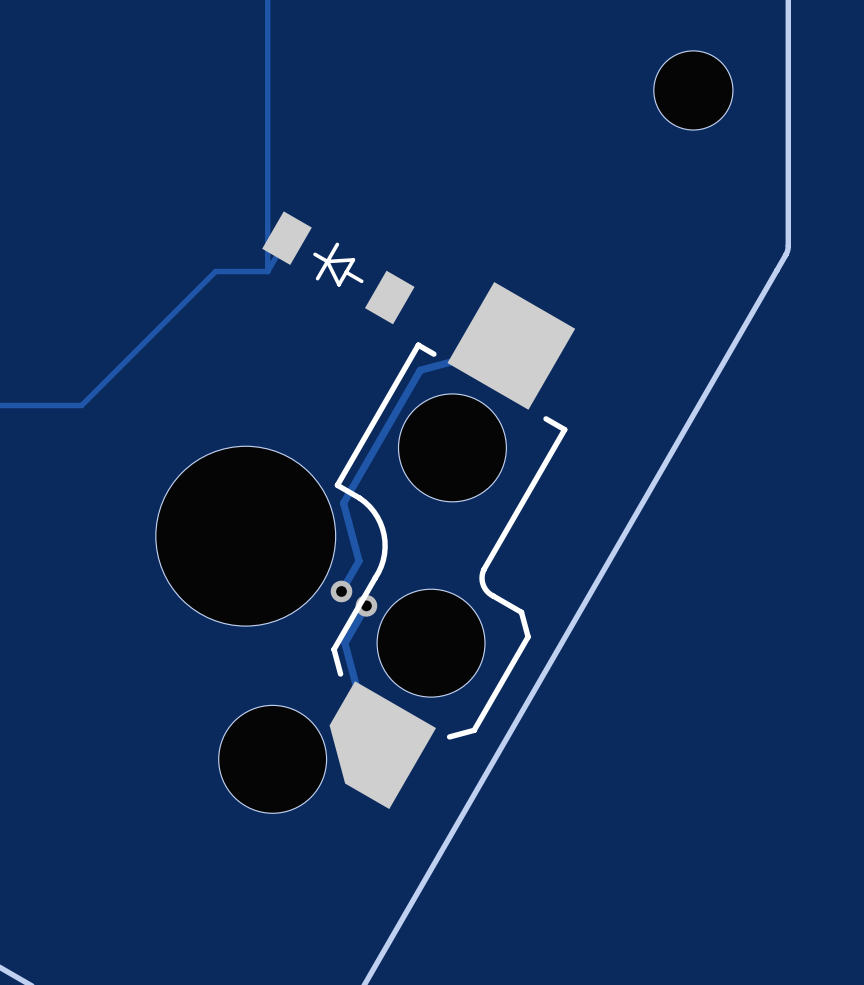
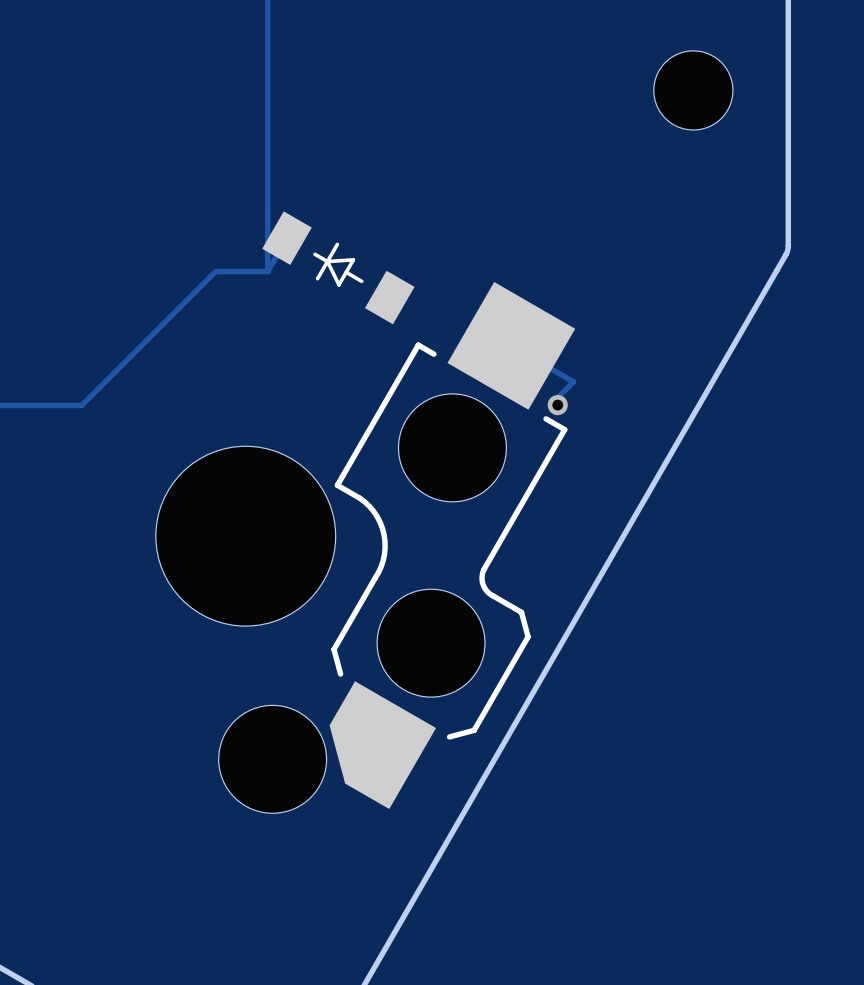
track: (511, 345) (420, 370) (343, 503) (359, 561) (341, 591) -> (511, 345) (573, 381) (557, 397) (557, 405)
via: none -> (557, 405)
via: (341, 591) -> none
track: (366, 605) (344, 643) (372, 745) -> none
via: (366, 605) -> none

